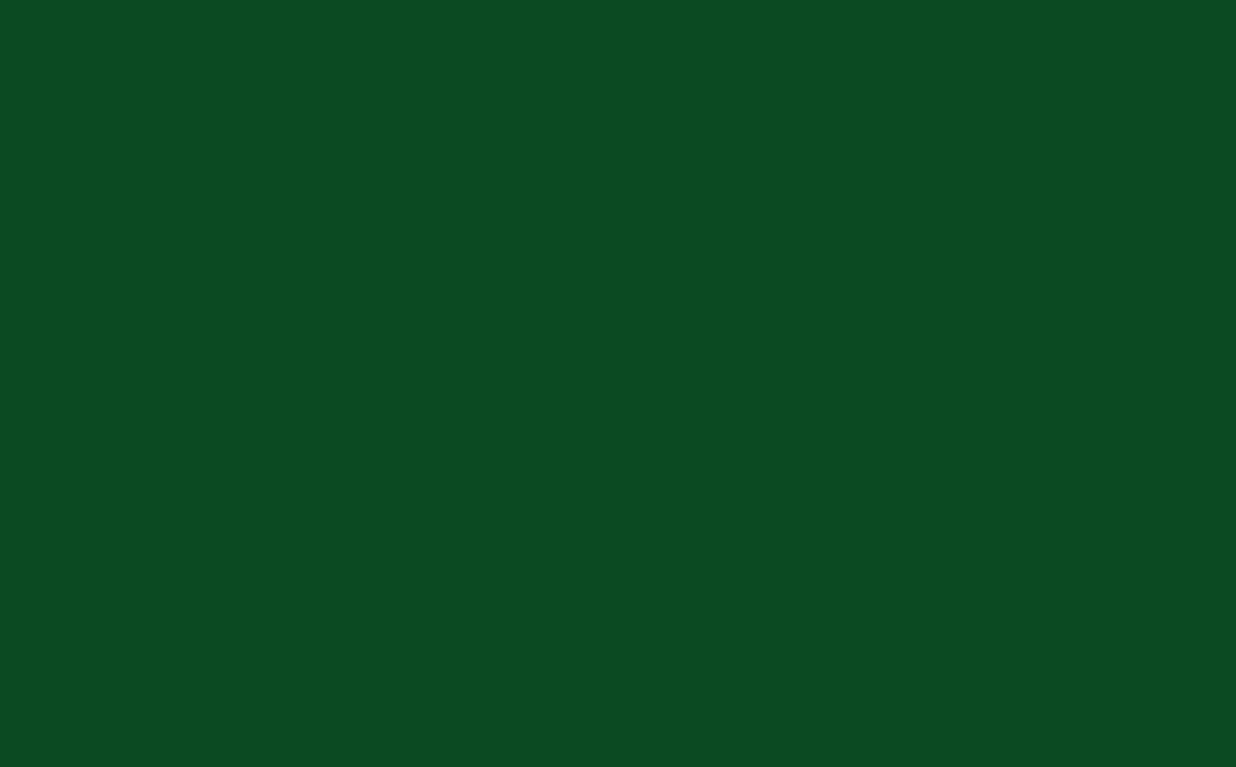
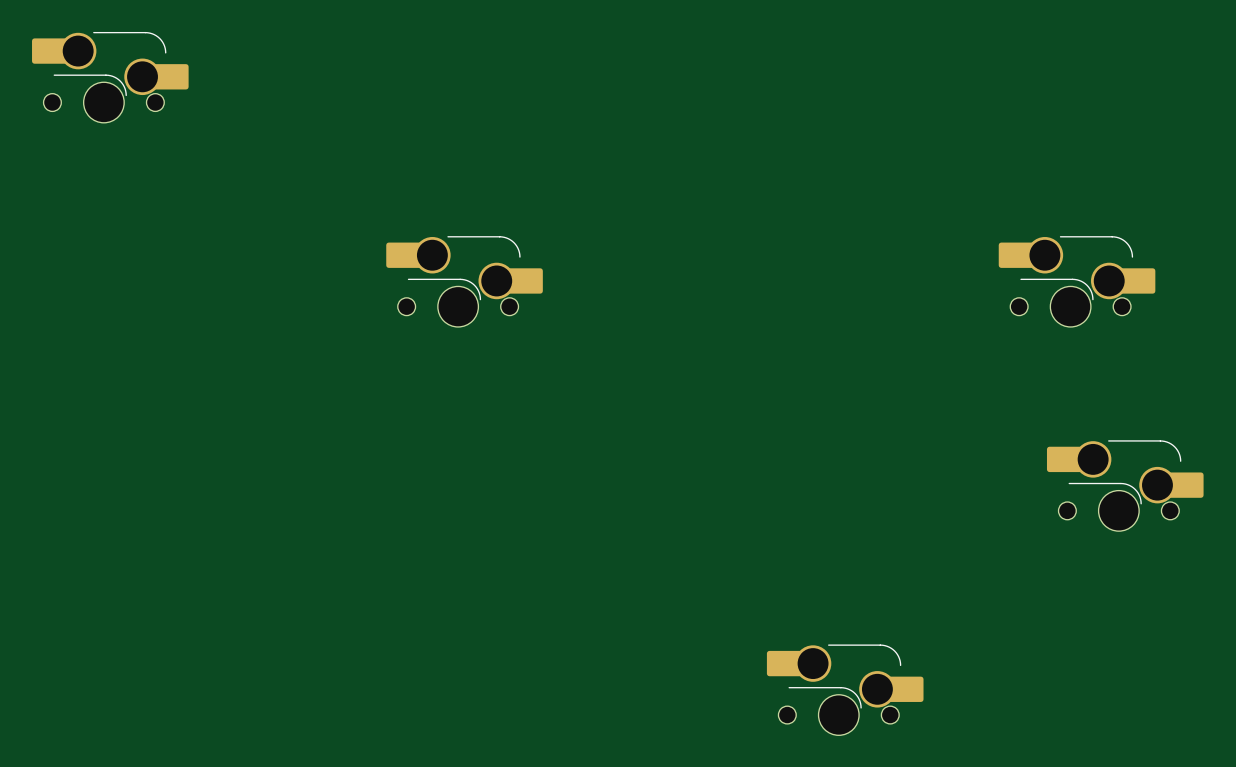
part: none -> (110, 77)
part: none -> (464, 281)
part: none -> (1077, 281)
part: none -> (1125, 485)
part: none -> (845, 689)

